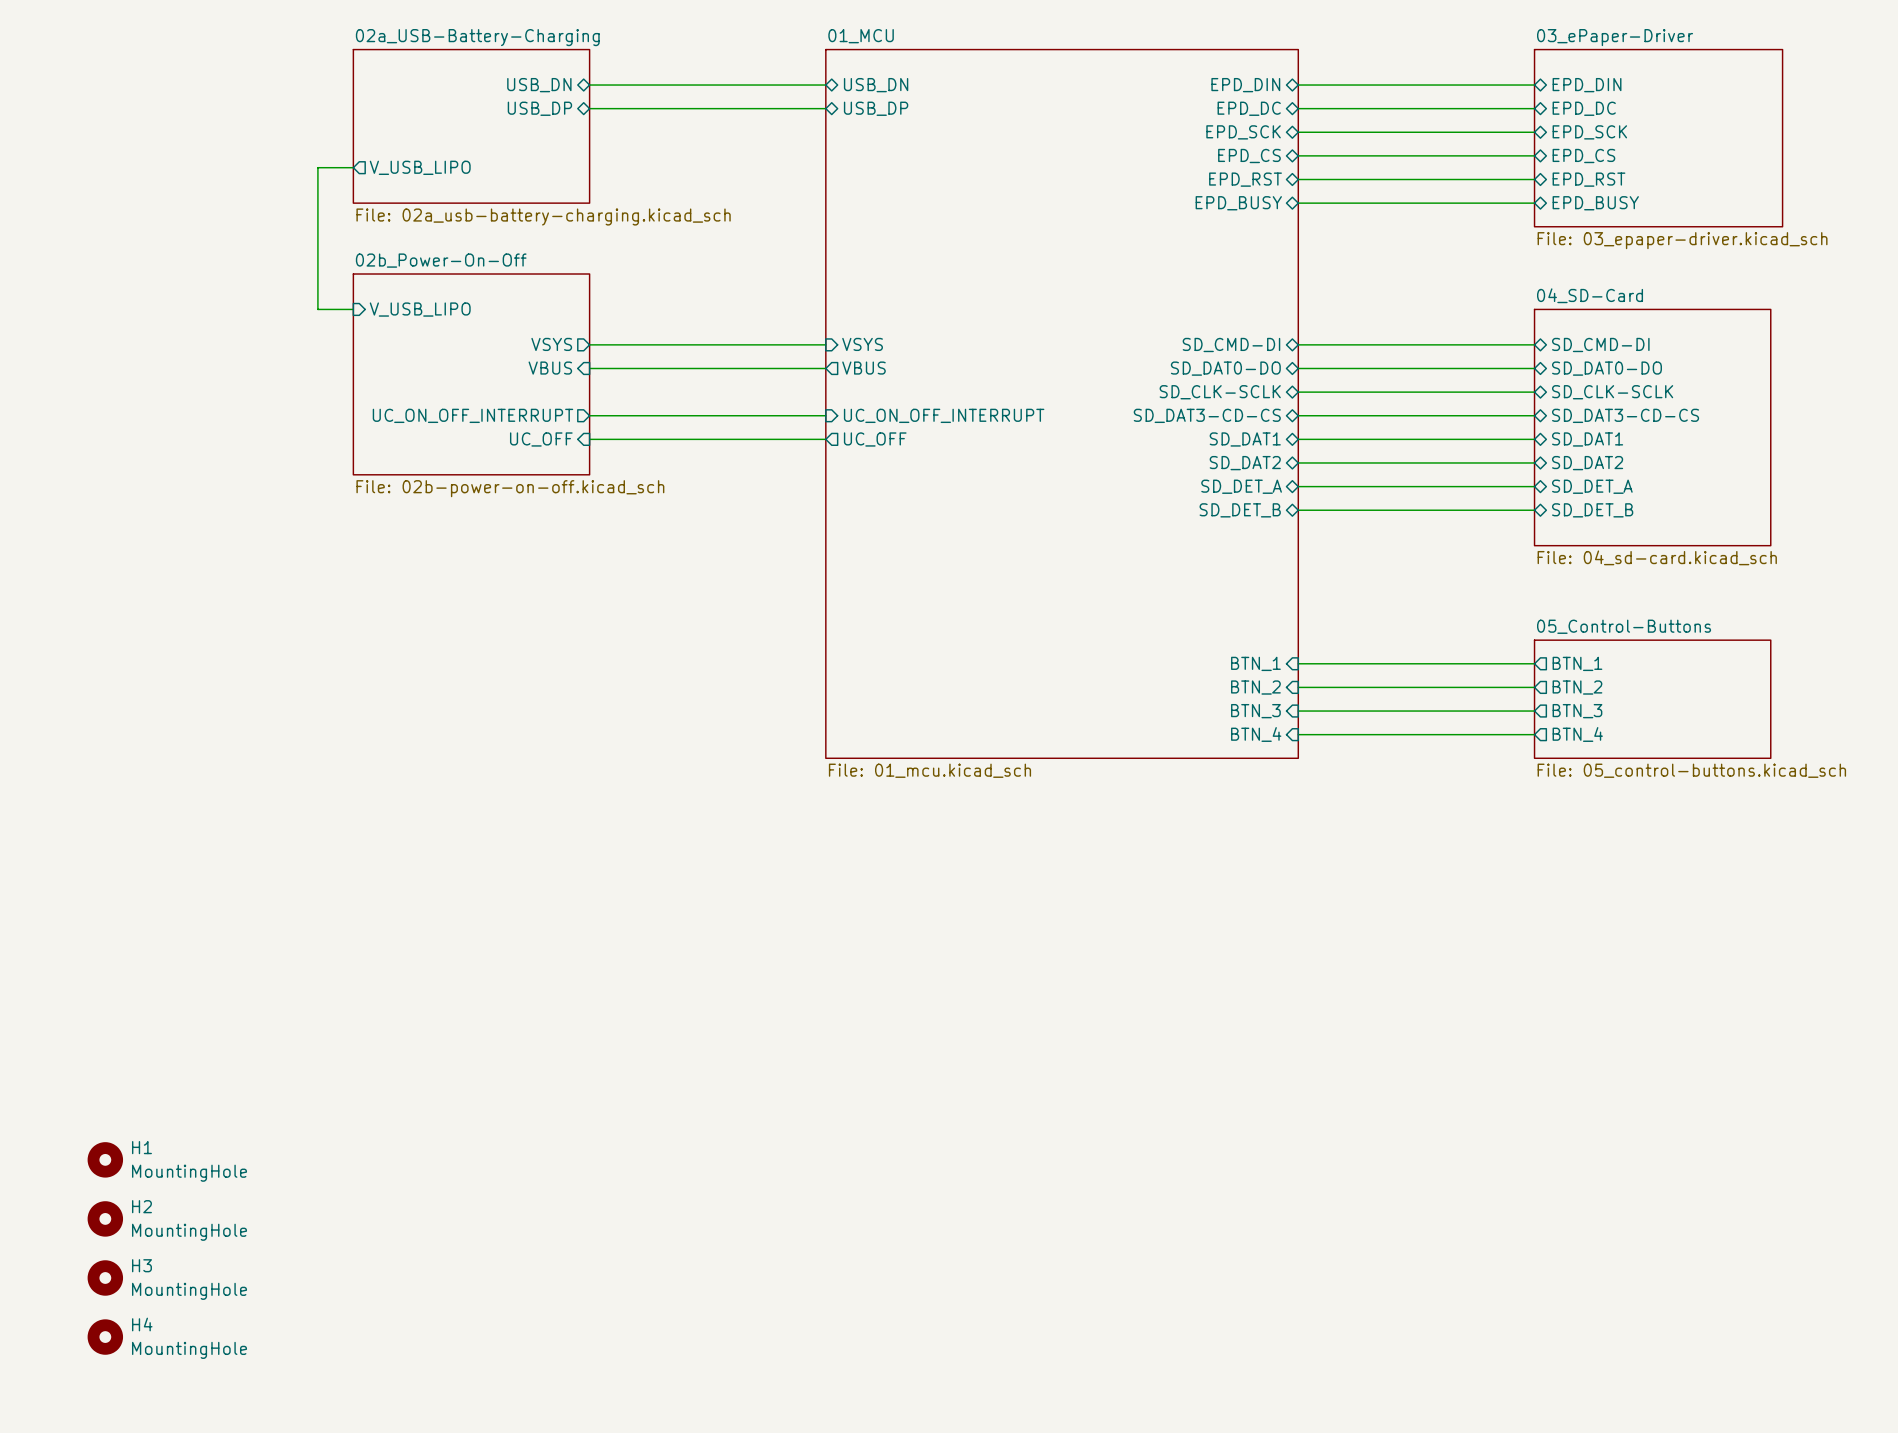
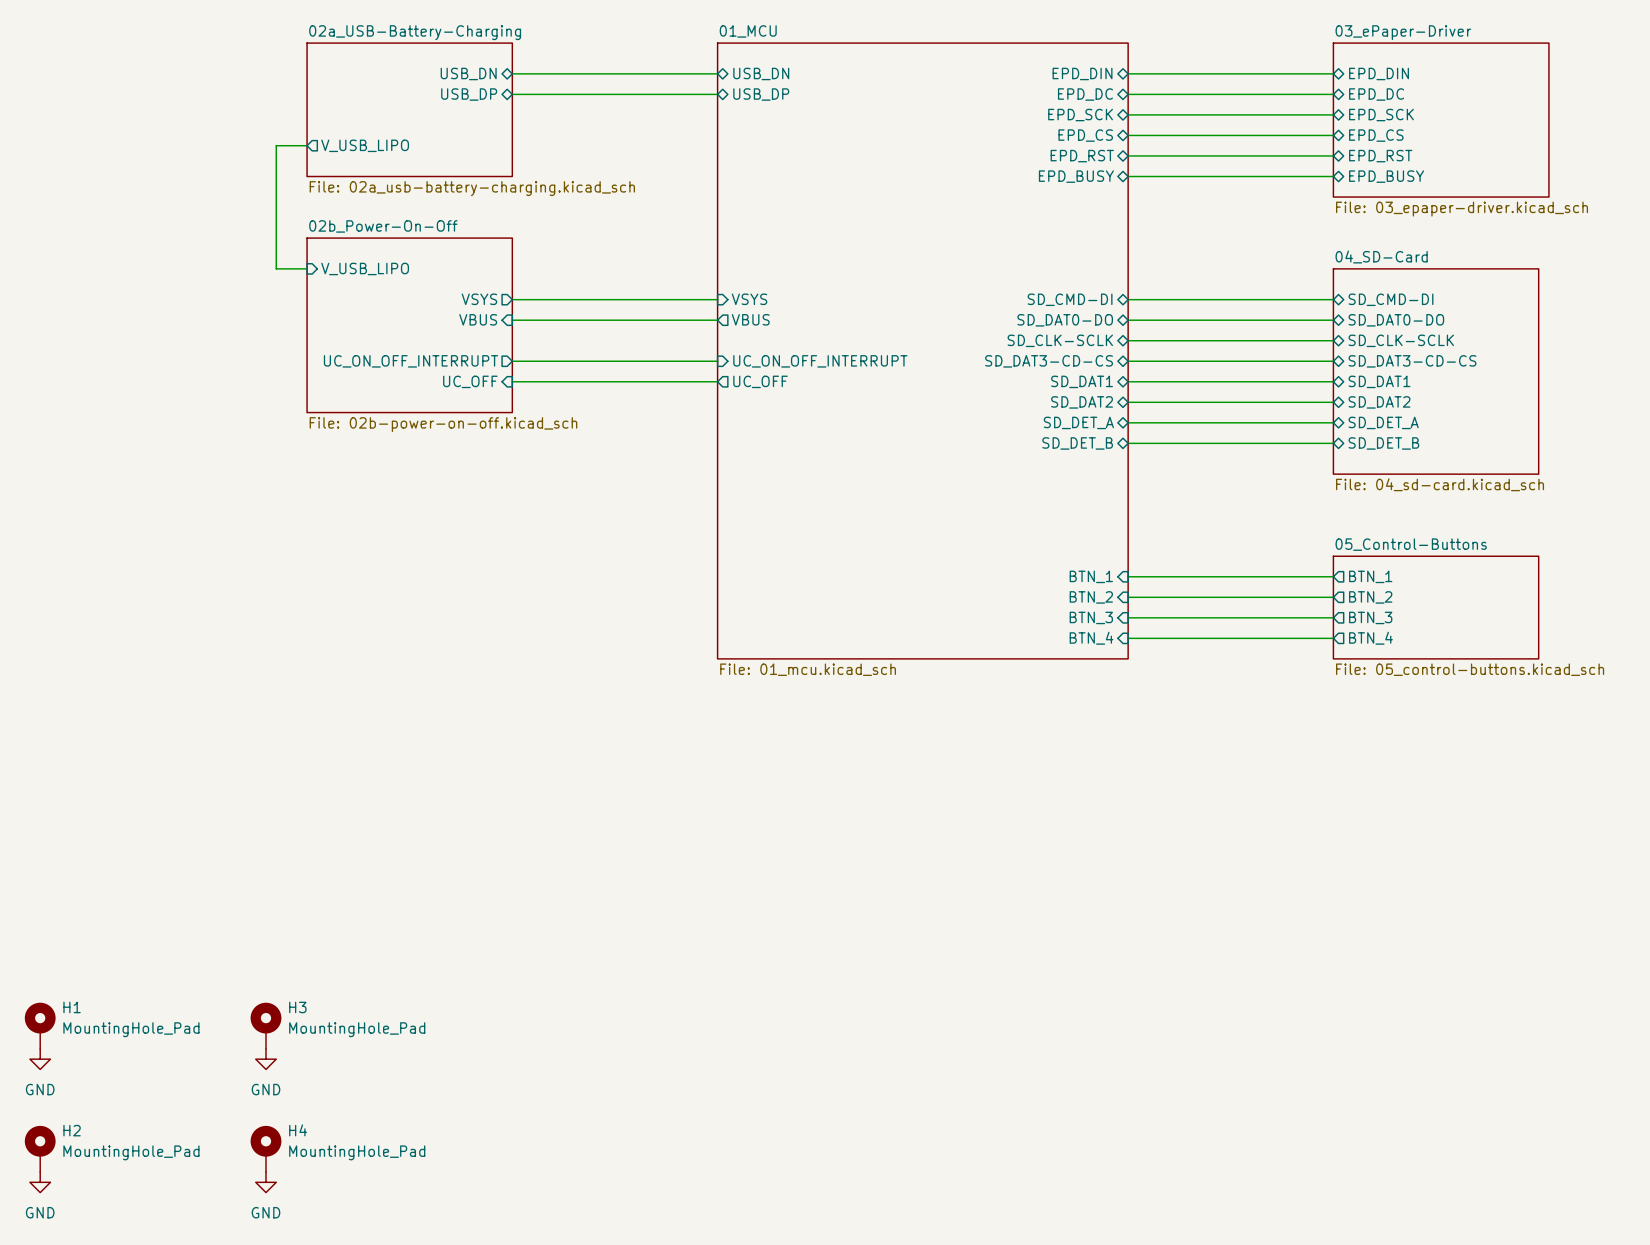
H1 symbol: [87, 1142, 124, 1178] -> [24, 1002, 56, 1049]
H1 value: MountingHole (189, 1173) -> MountingHole_Pad (131, 1029)
H2 symbol: [87, 1201, 124, 1237] -> [24, 1125, 56, 1173]
power symbol: none -> GND (40, 1059)
power symbol: none -> GND (266, 1059)
H2 value: MountingHole (189, 1232) -> MountingHole_Pad (131, 1152)
H3 symbol: [87, 1260, 124, 1296] -> [250, 1002, 282, 1049]
H3 value: MountingHole (189, 1291) -> MountingHole_Pad (357, 1029)
H4 symbol: [87, 1319, 124, 1355] -> [250, 1125, 282, 1173]
H4 value: MountingHole (189, 1350) -> MountingHole_Pad (357, 1152)
power symbol: none -> GND (40, 1182)
power symbol: none -> GND (266, 1182)

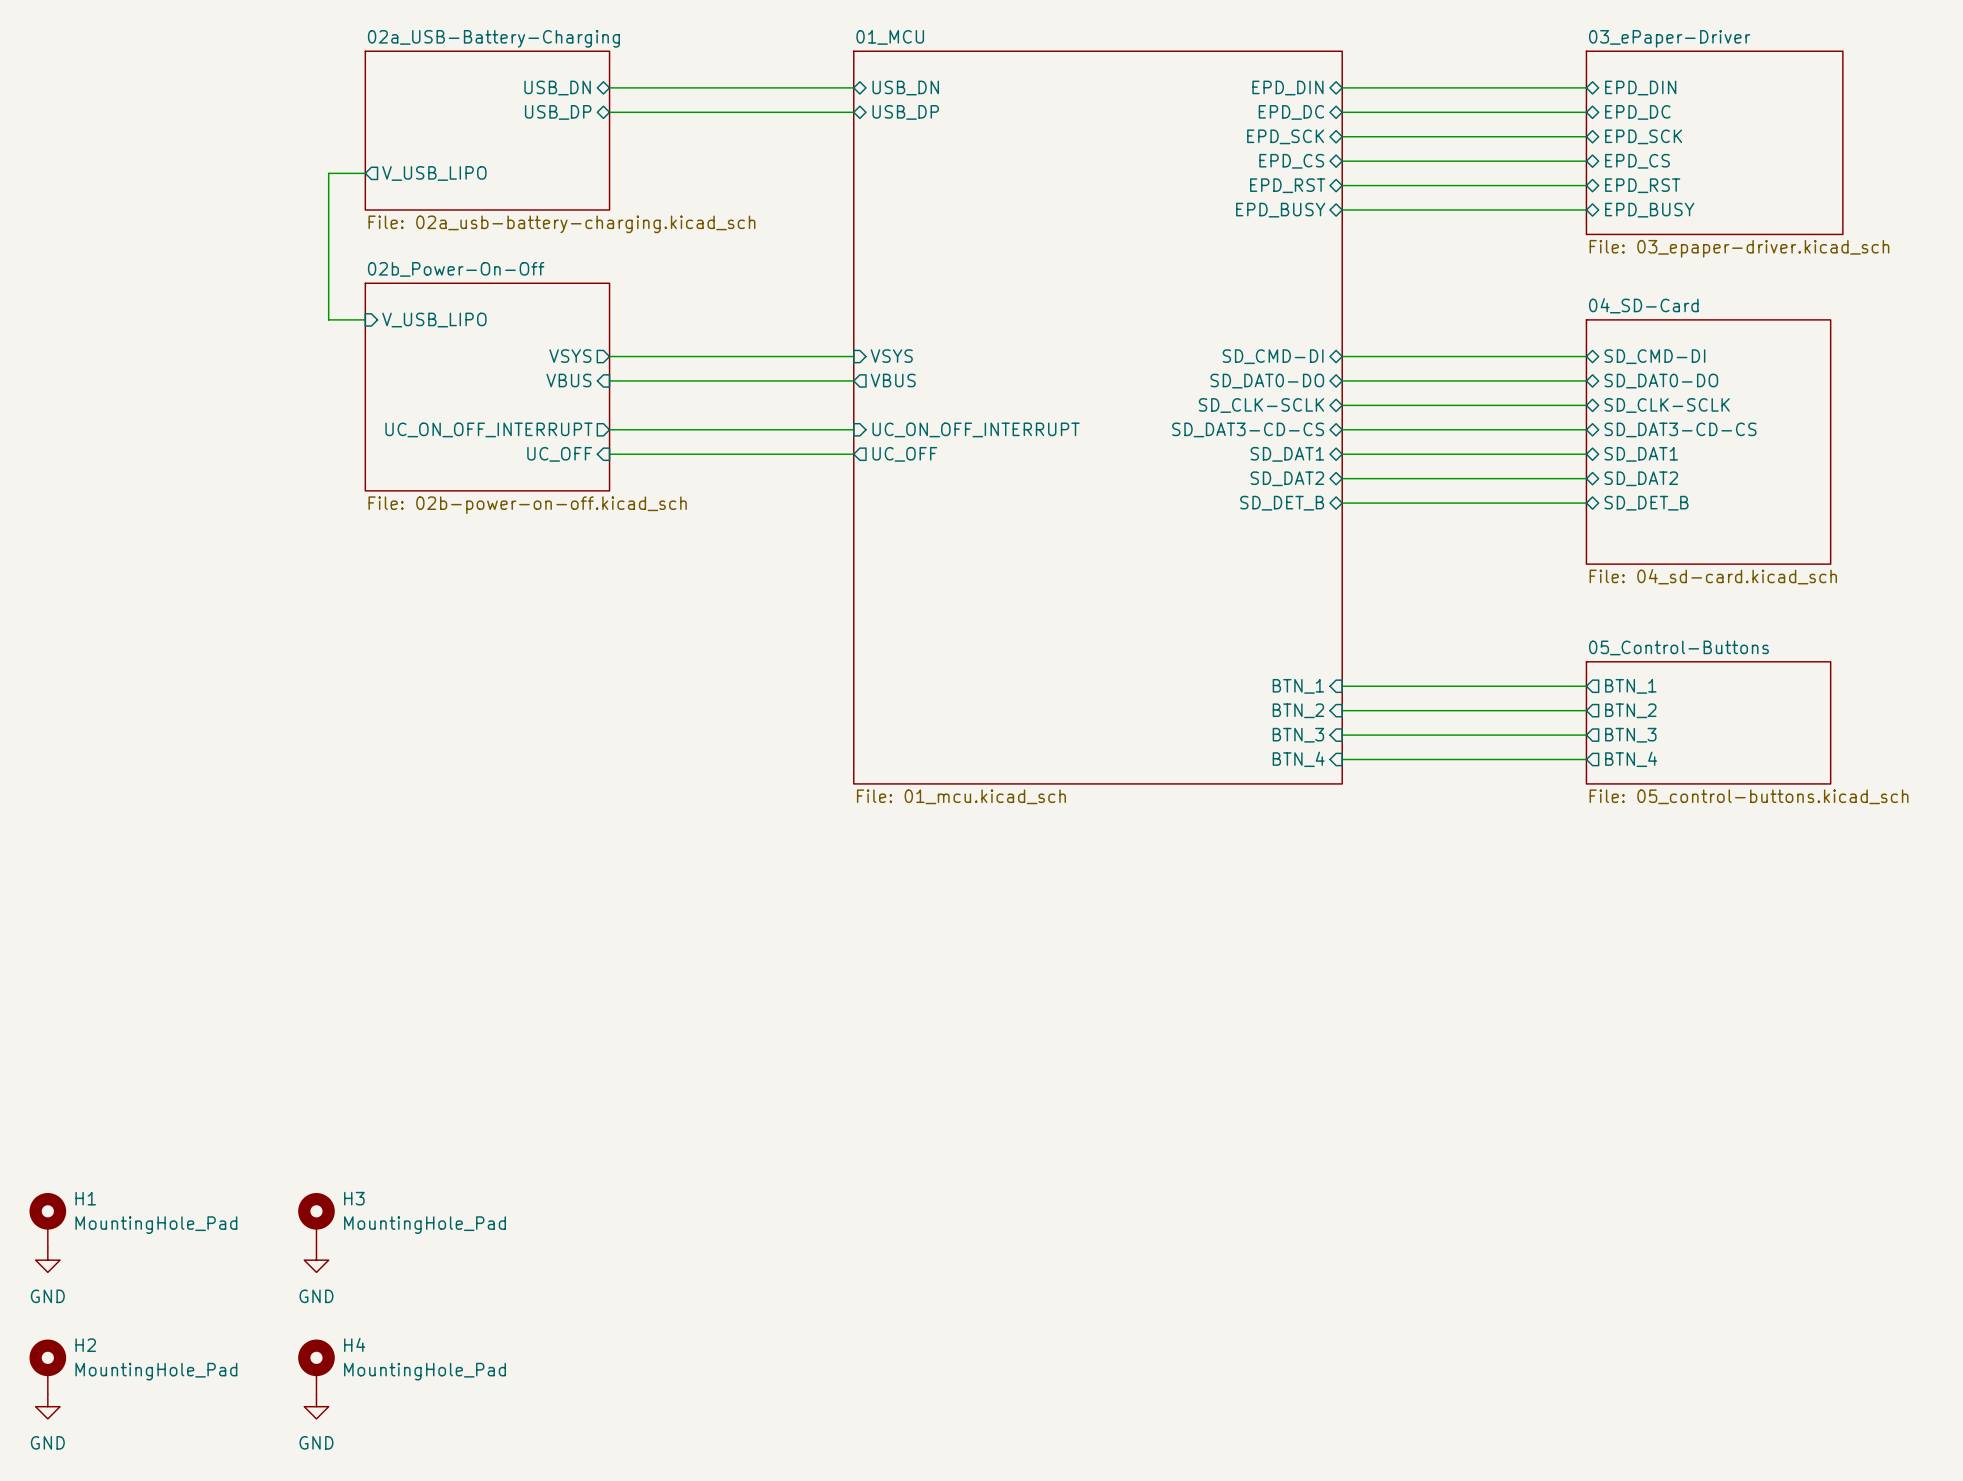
sheet pin: SD_DET_A (1078, 422) -> SD_DET_B (1282, 503)
sheet pin: SD_DET_A (1383, 422) -> SD_DET_B (1646, 503)
sheet pin: SD_DET_B (1077, 443) -> none
wire: (1128, 443) (1333, 443) -> none
sheet pin: SD_DET_B (1383, 443) -> none

